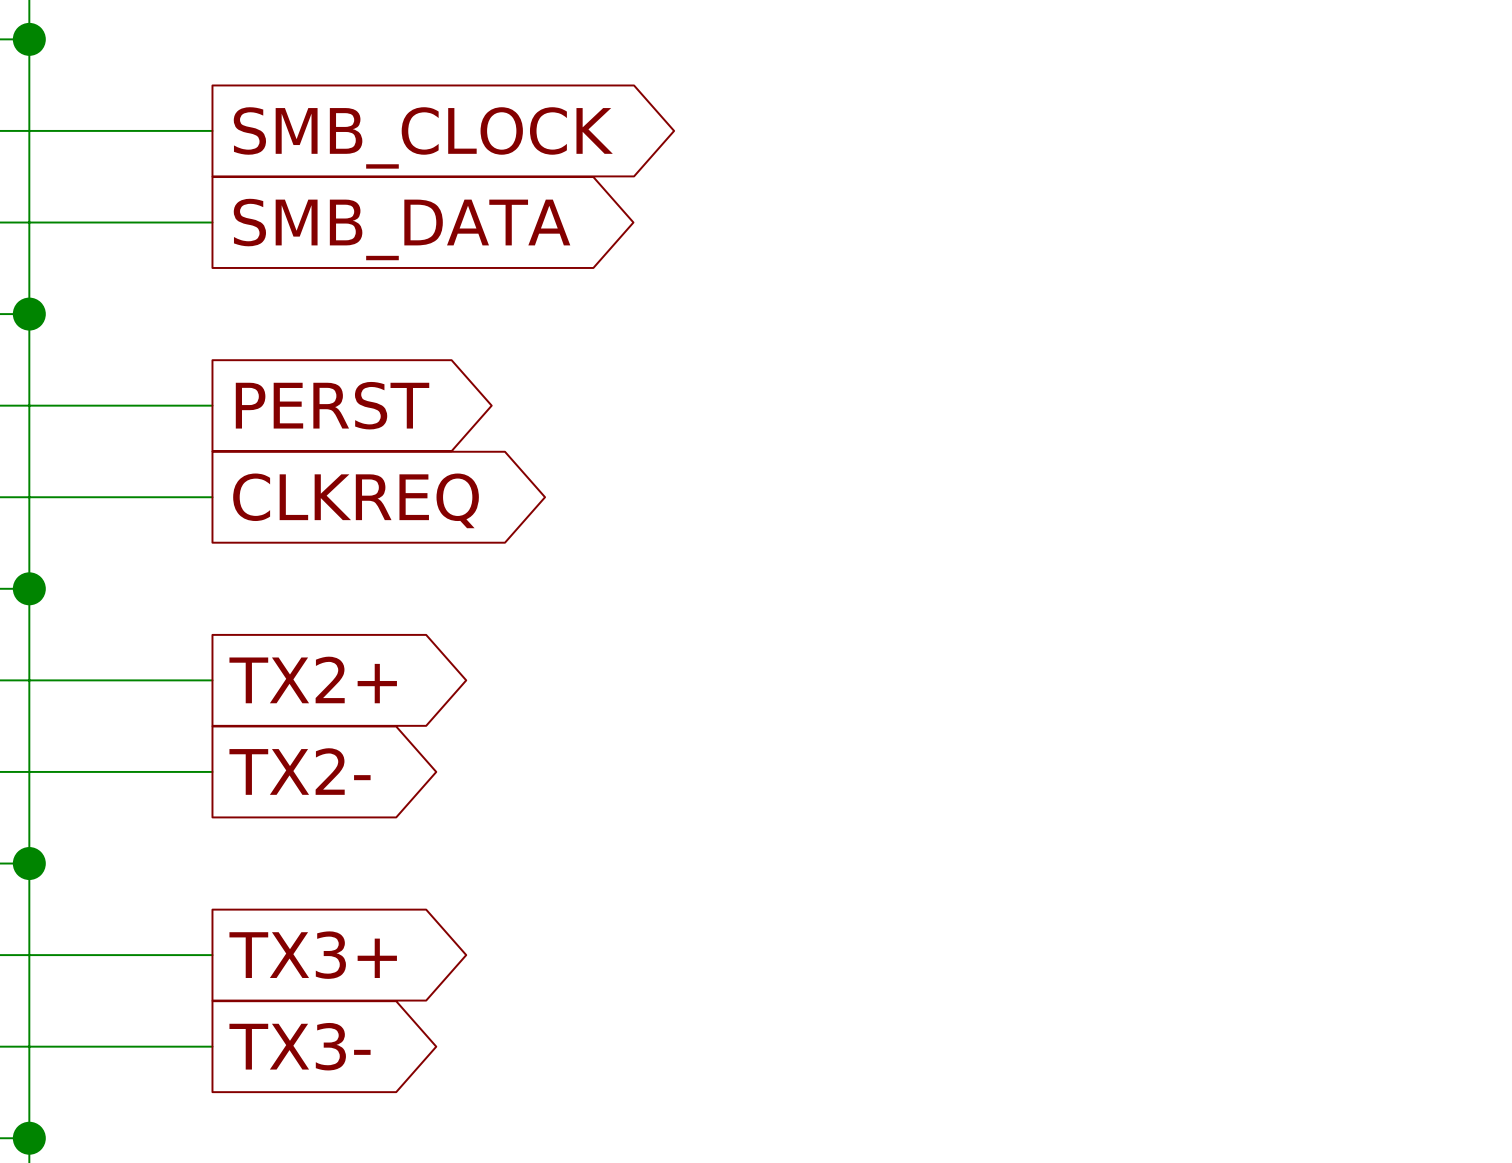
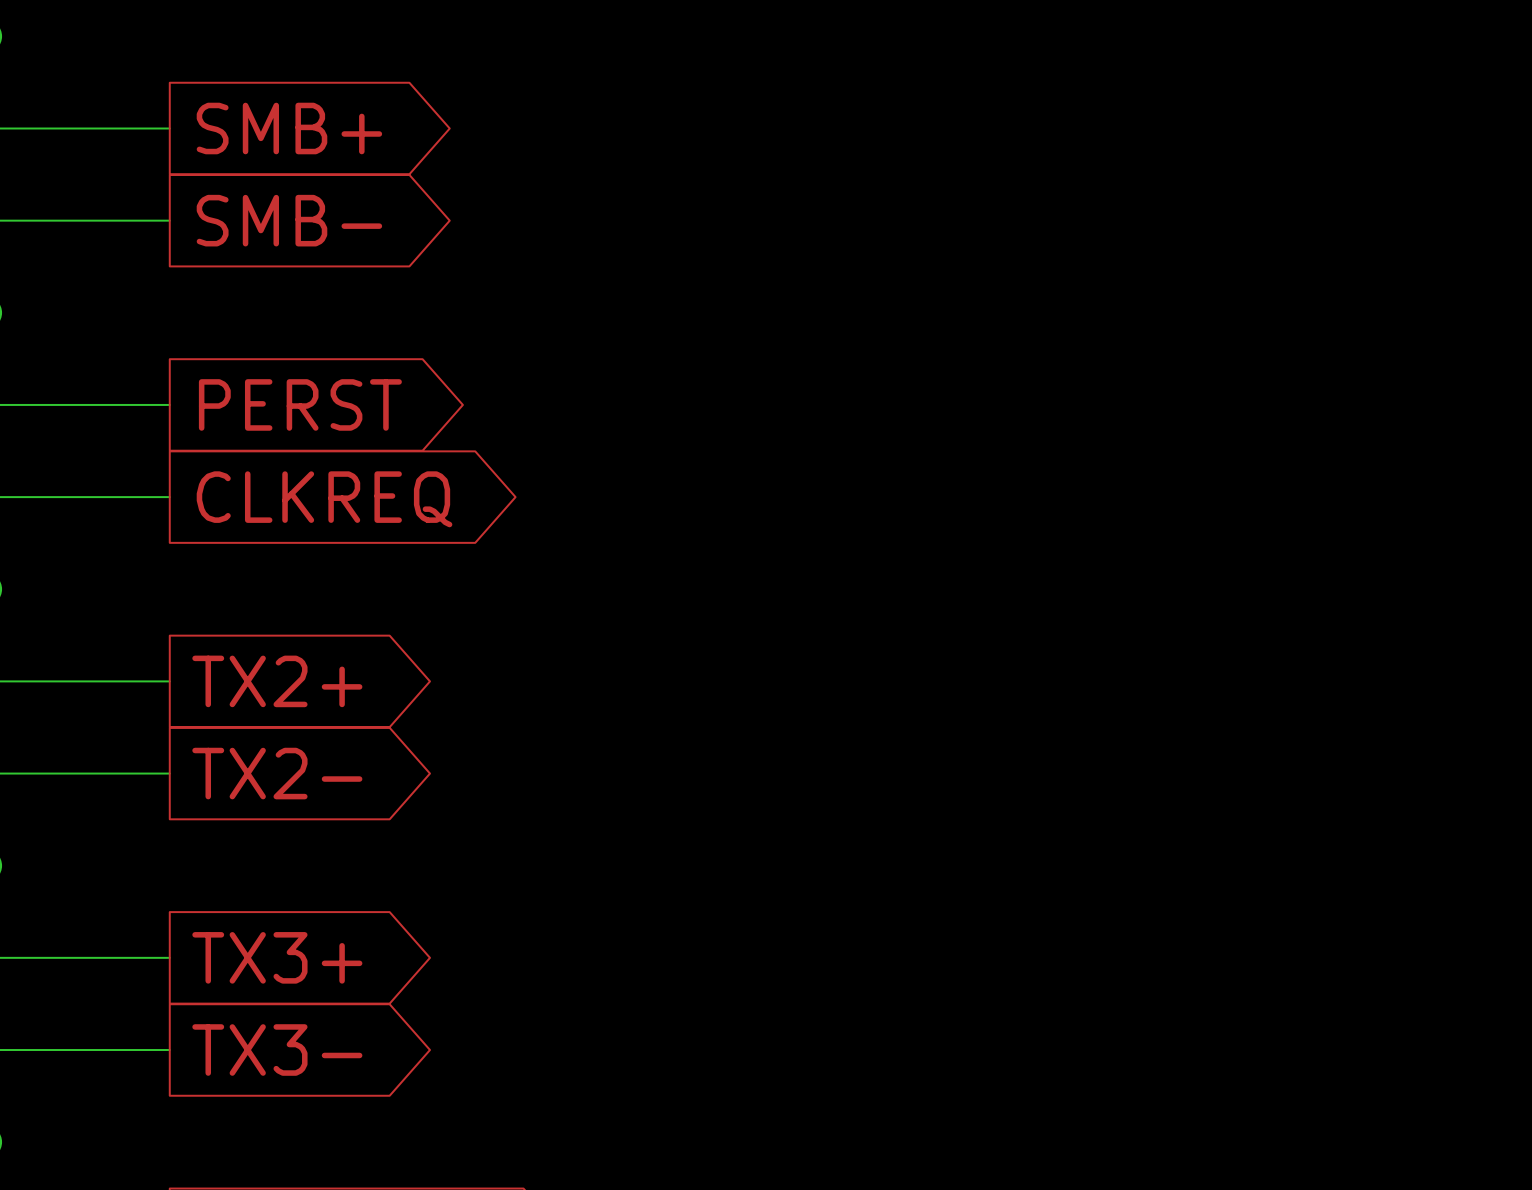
global label: SMB_CLOCK (423, 137) -> SMB+ (289, 128)
global label: SMB_DATA (402, 229) -> SMB- (289, 220)

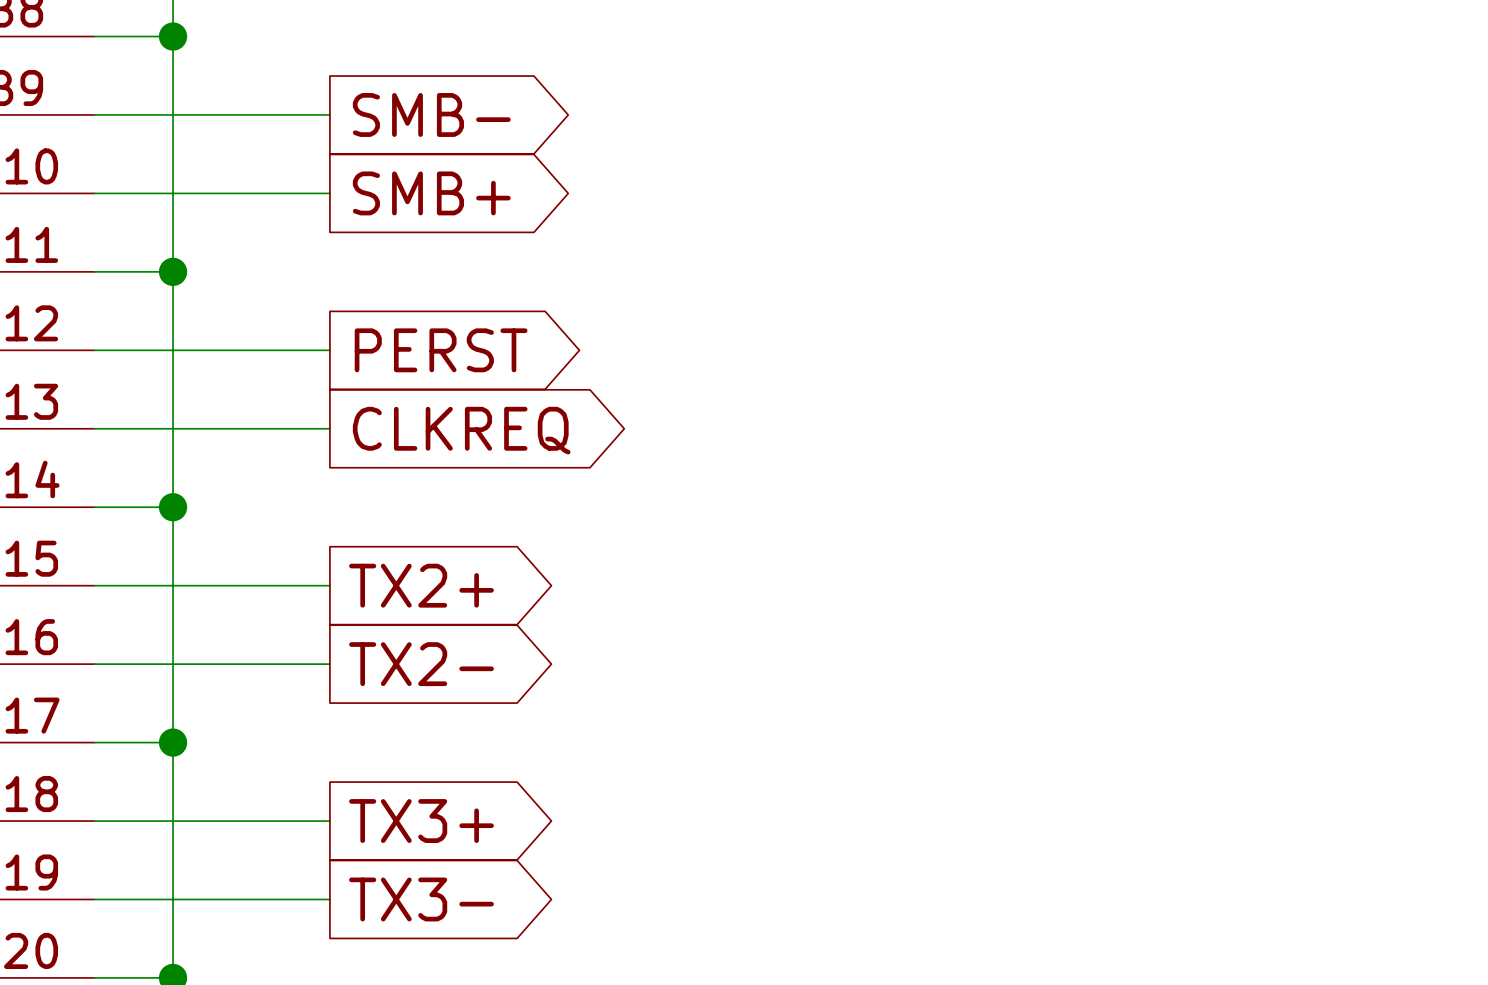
global label: SMB+ (289, 128) -> SMB- (431, 114)
global label: SMB- (289, 220) -> SMB+ (431, 193)

